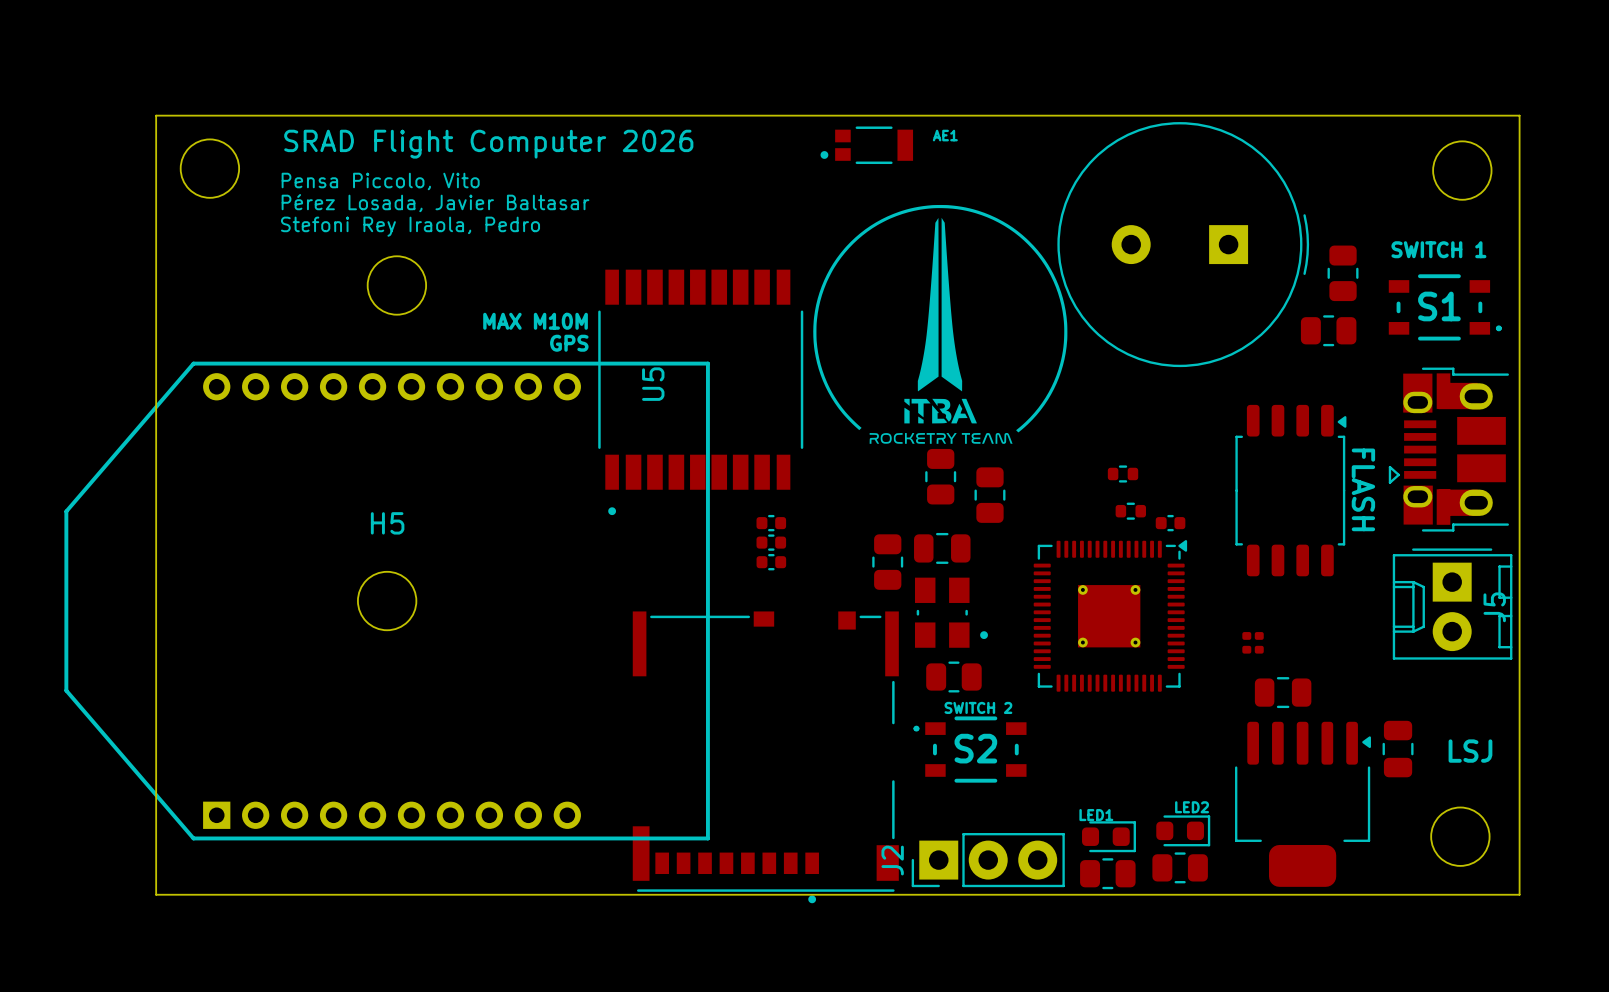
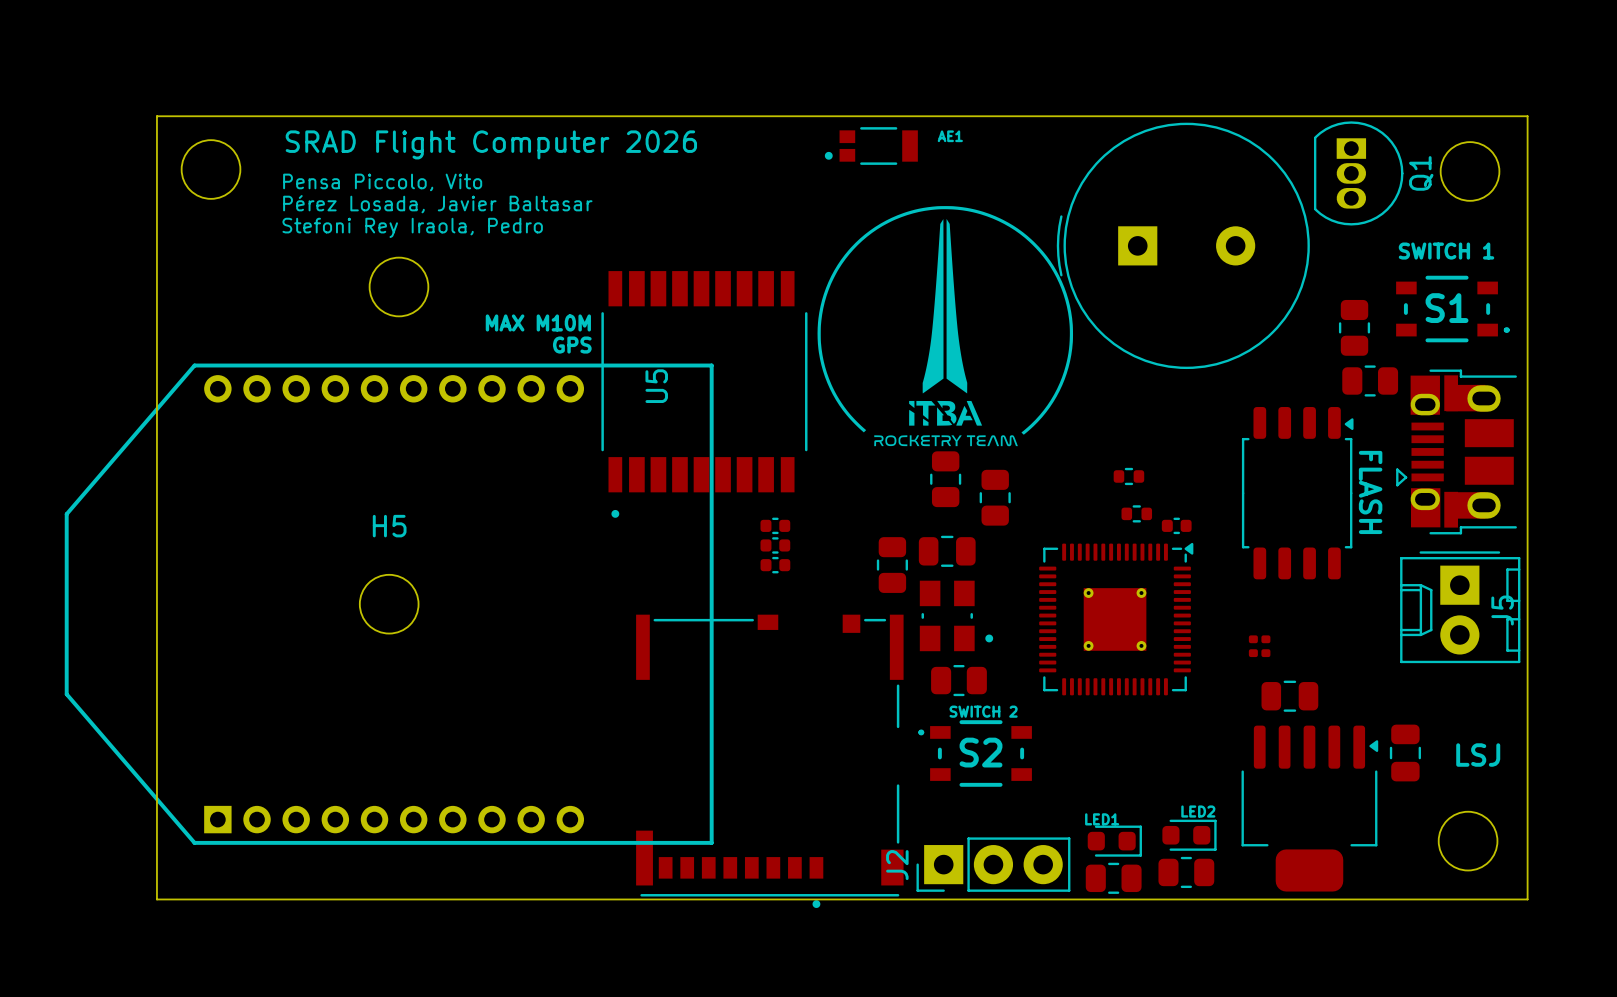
Q1: none -> (1358, 173)
part rotation: 0° (1183, 244) -> 180° (1183, 245)
part rotation: 0° (1343, 273) -> 90° clockwise (1370, 380)
part position: (1343, 273) -> (1370, 380)
part rotation: 0° (1328, 330) -> 90° clockwise (1354, 327)

